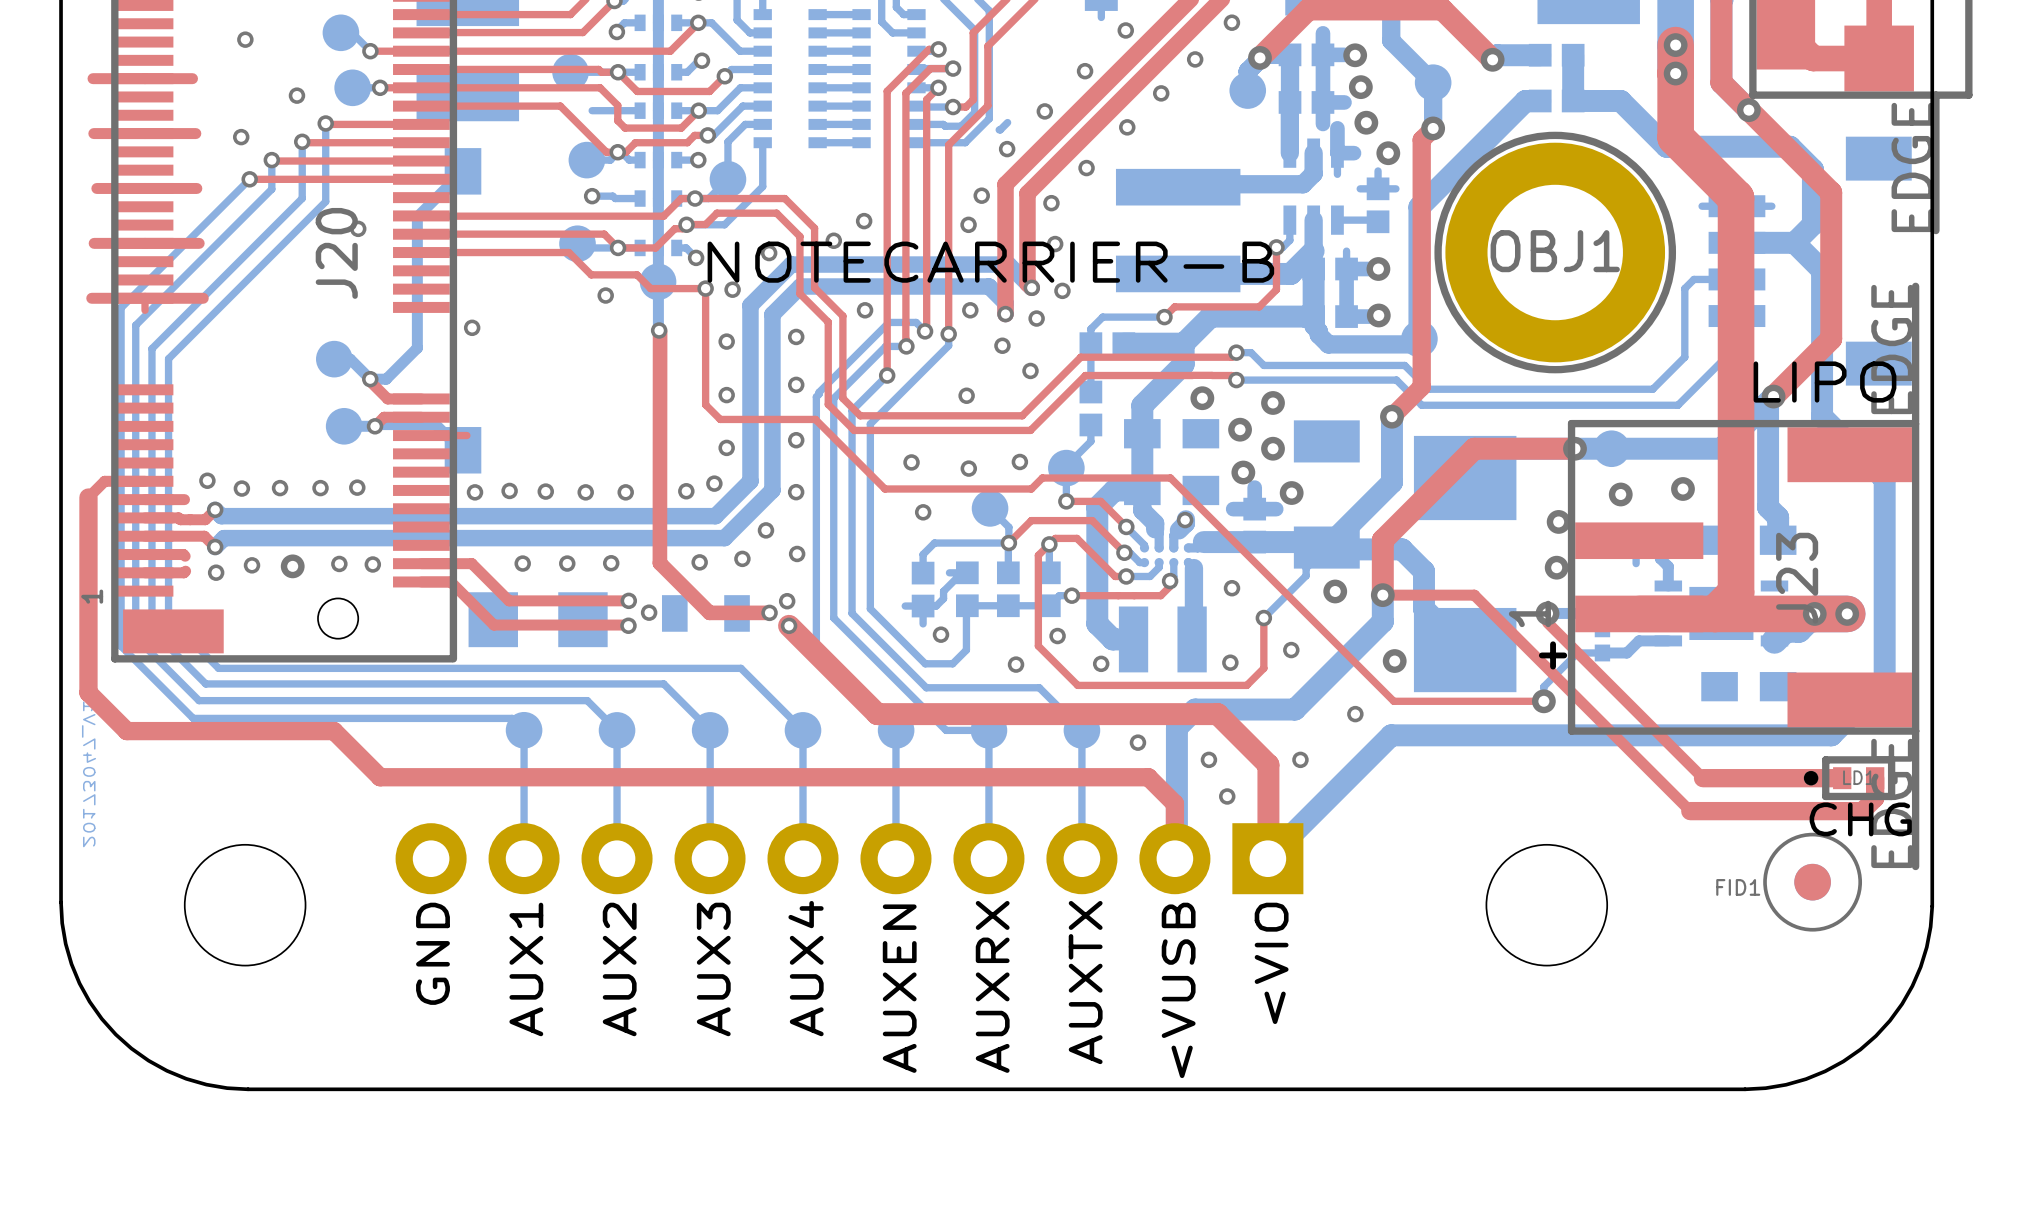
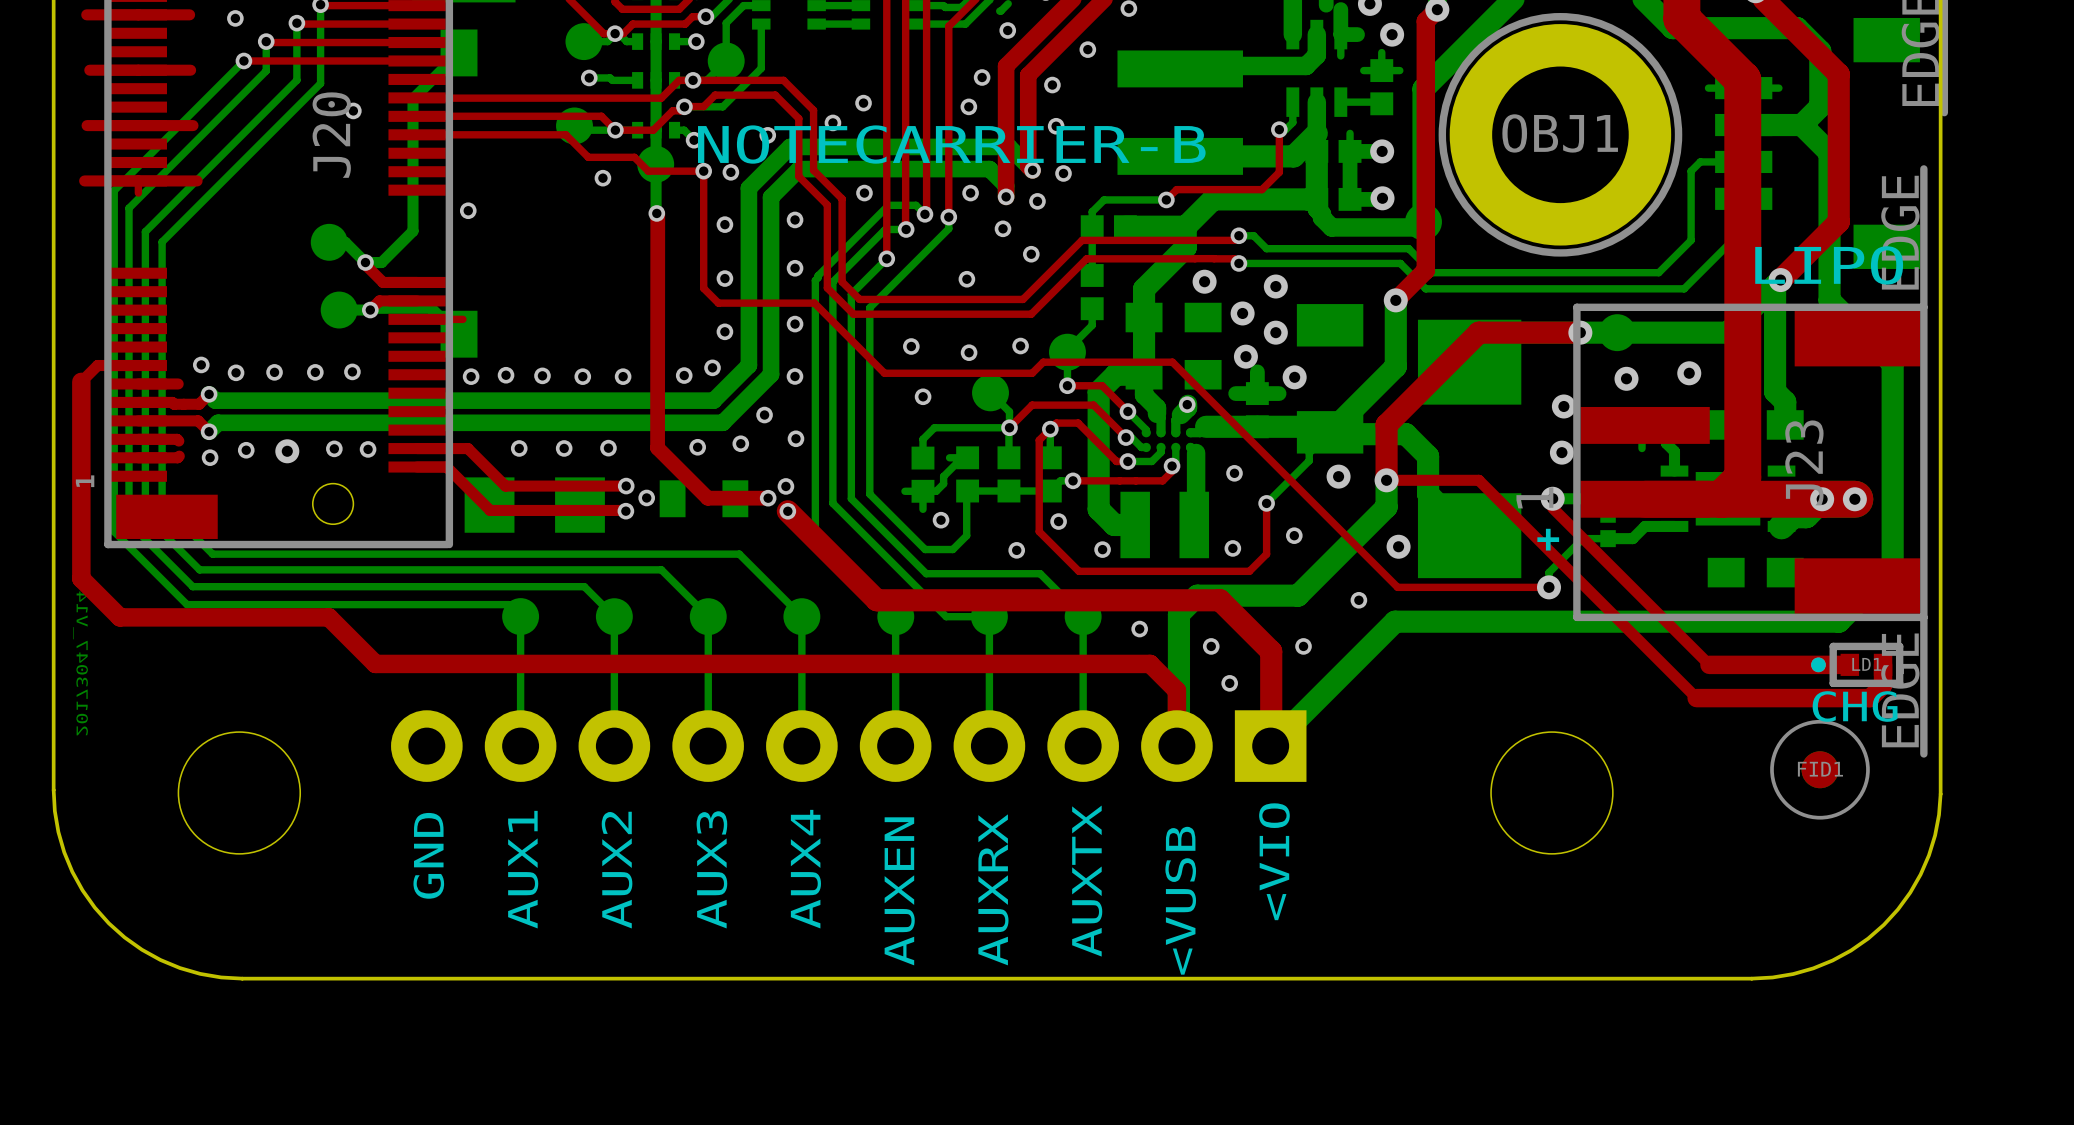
FID1 name position: FID1 (1738, 887) -> FID1 (1820, 769)

